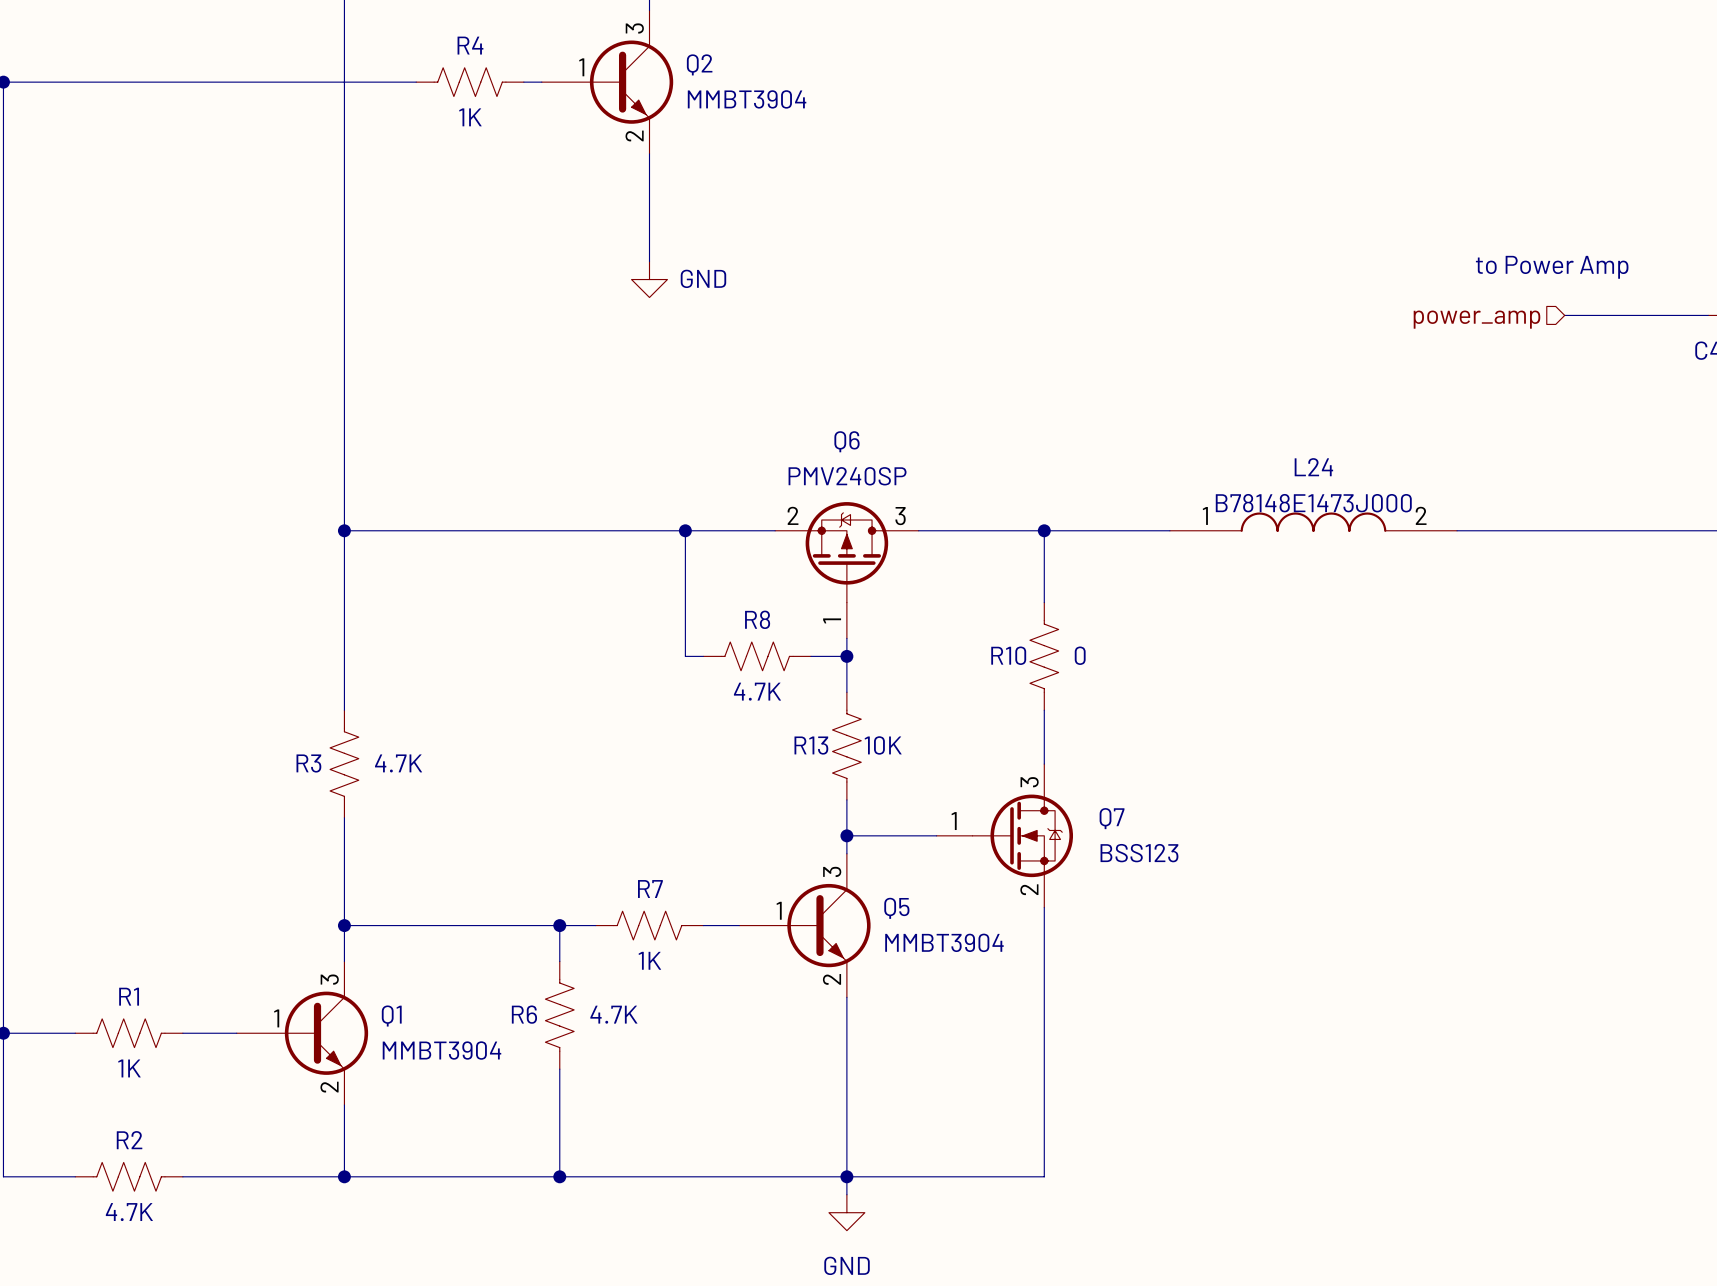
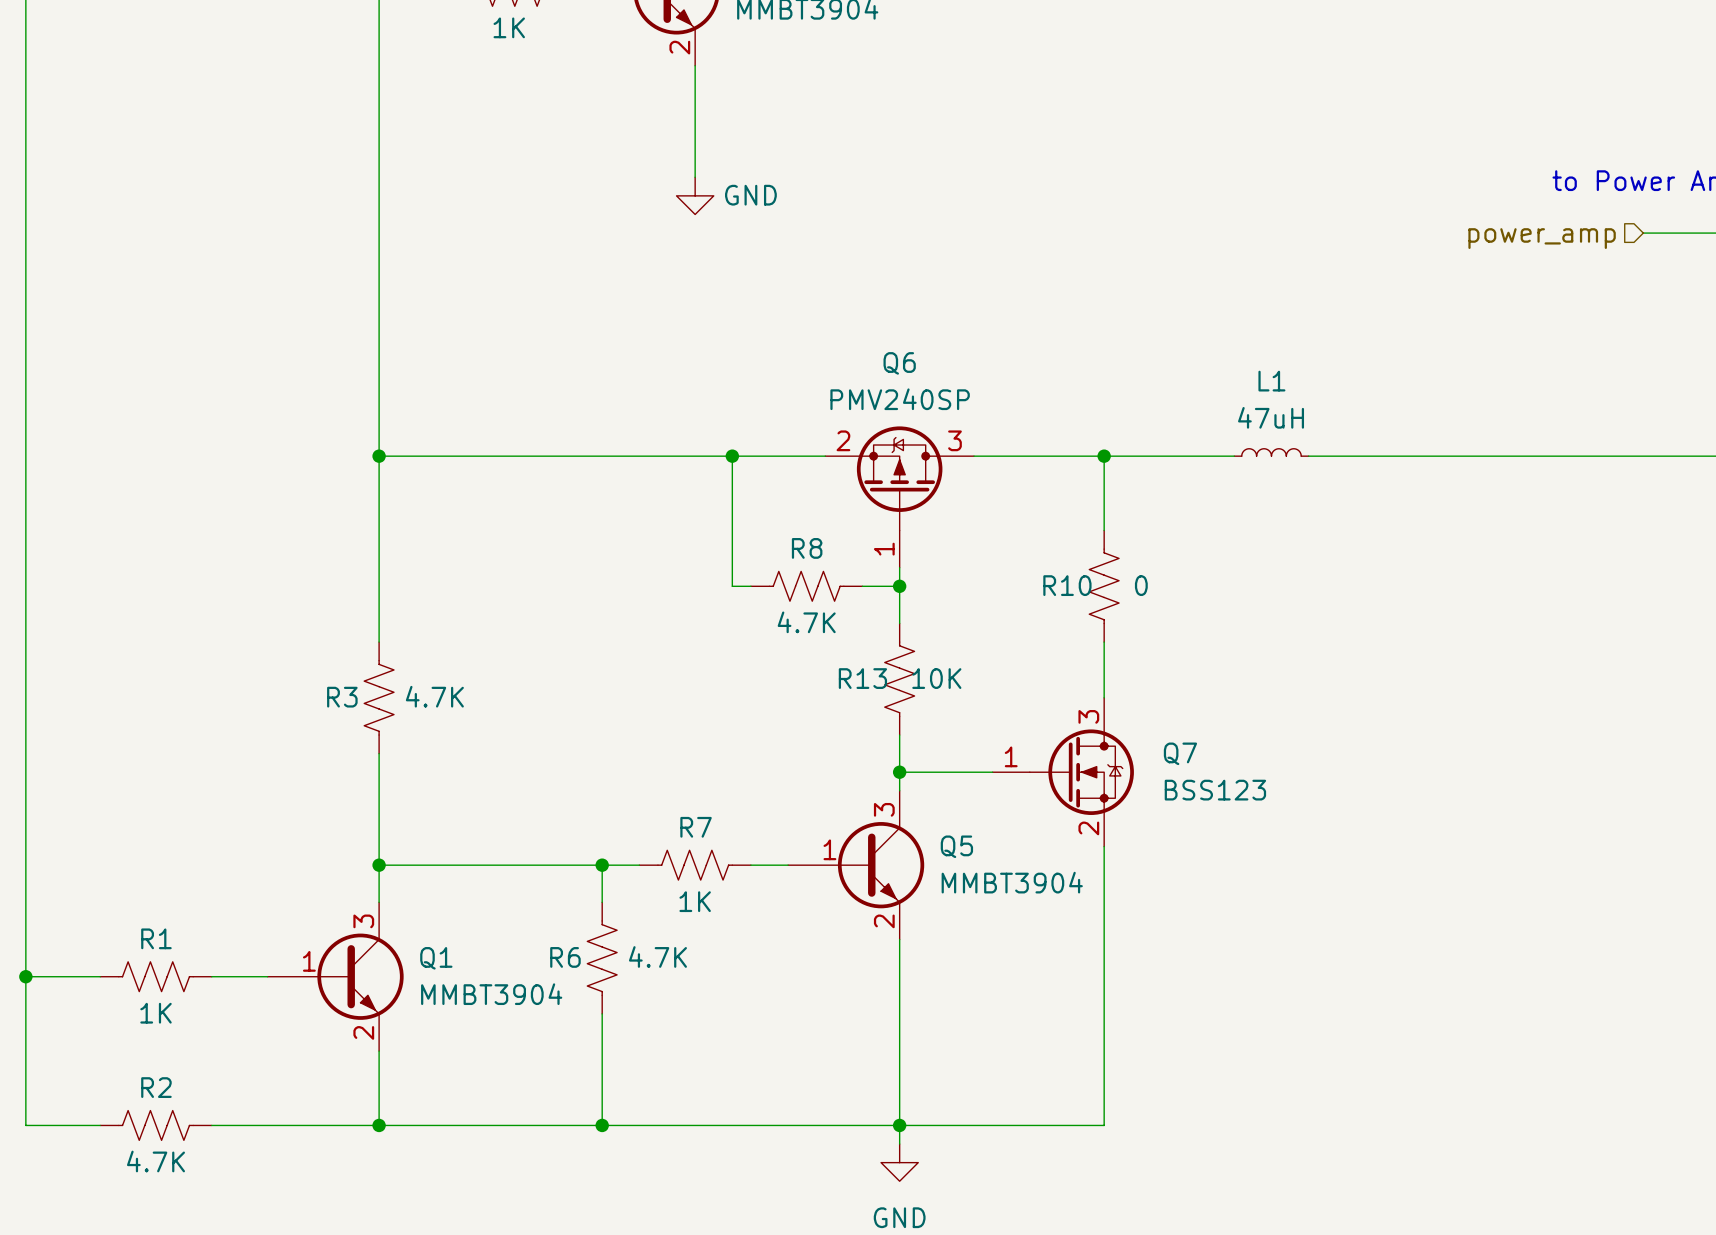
L24: B78148E1473J000 (1313, 522) -> none
L1: none -> 47uH (1271, 452)
wire: none -> (1308, 456) (1531, 456)

